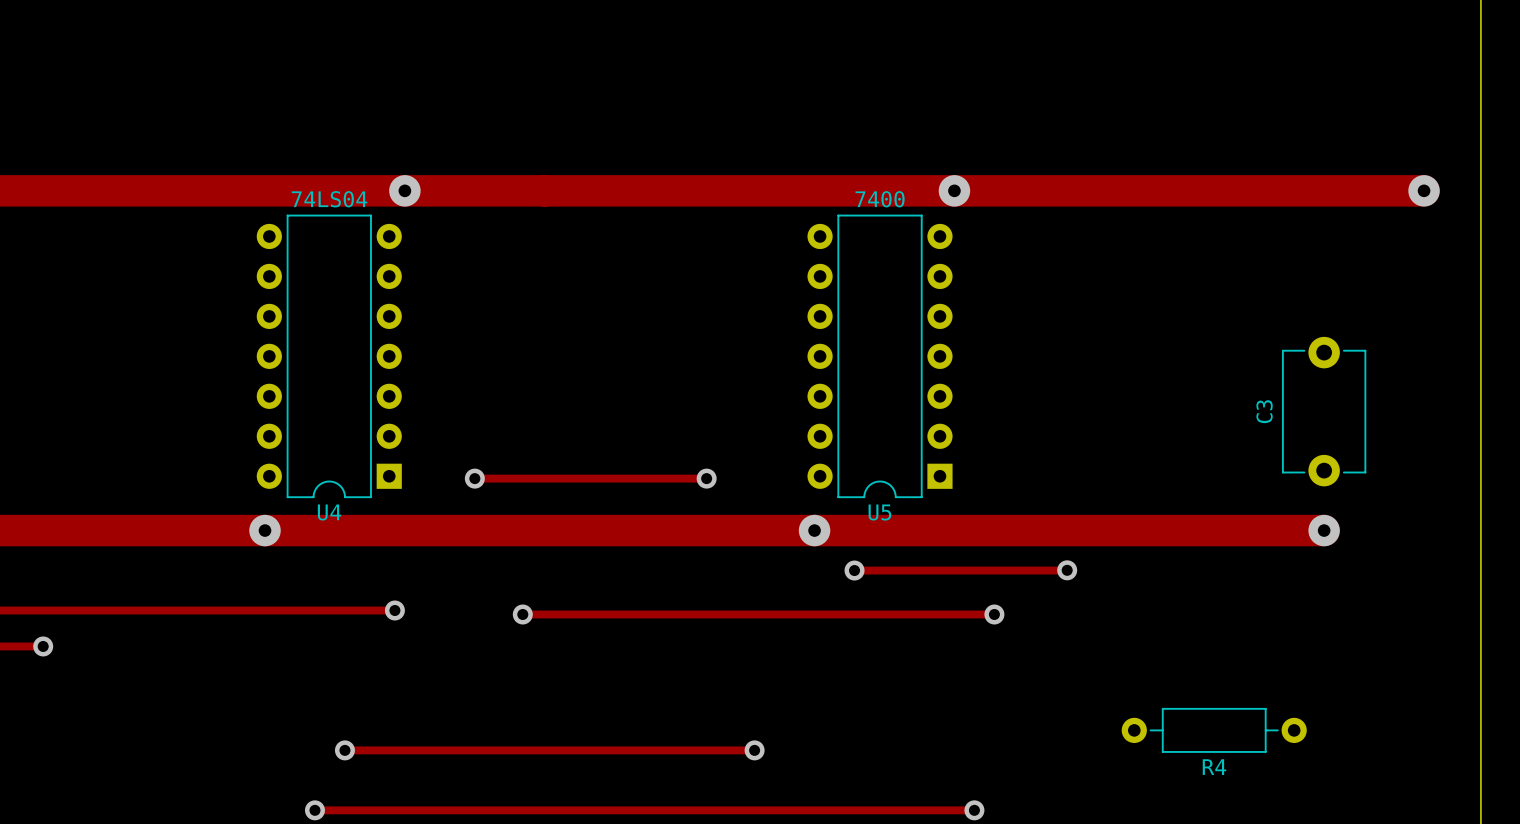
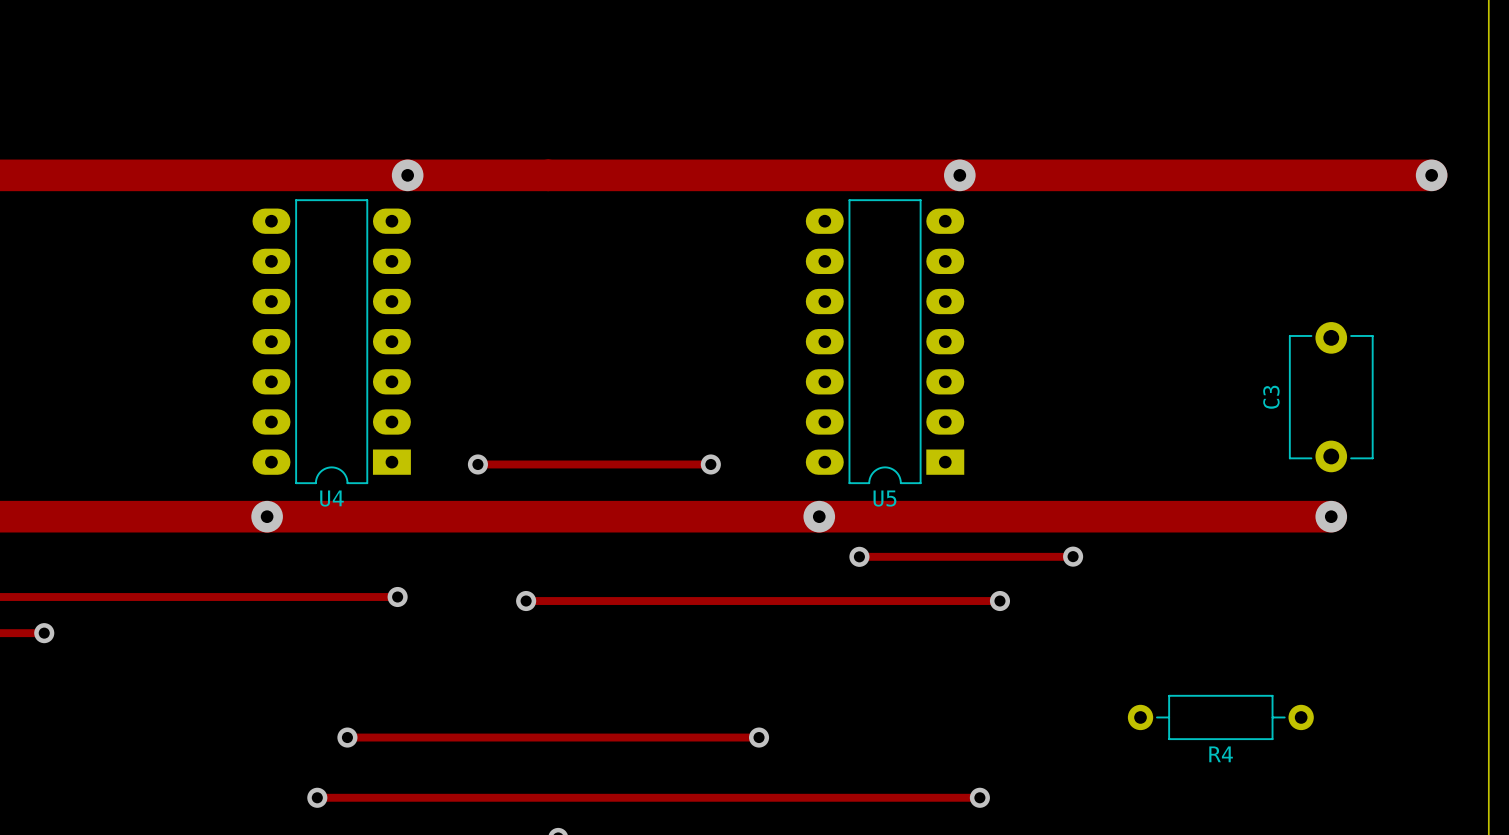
U4 value: 74LS04 (329, 199) -> none
U5 value: 7400 (880, 199) -> none
U4 footprint: [256, 214, 402, 499] -> [252, 199, 411, 485]
U5 footprint: [807, 214, 953, 499] -> [805, 199, 965, 485]

